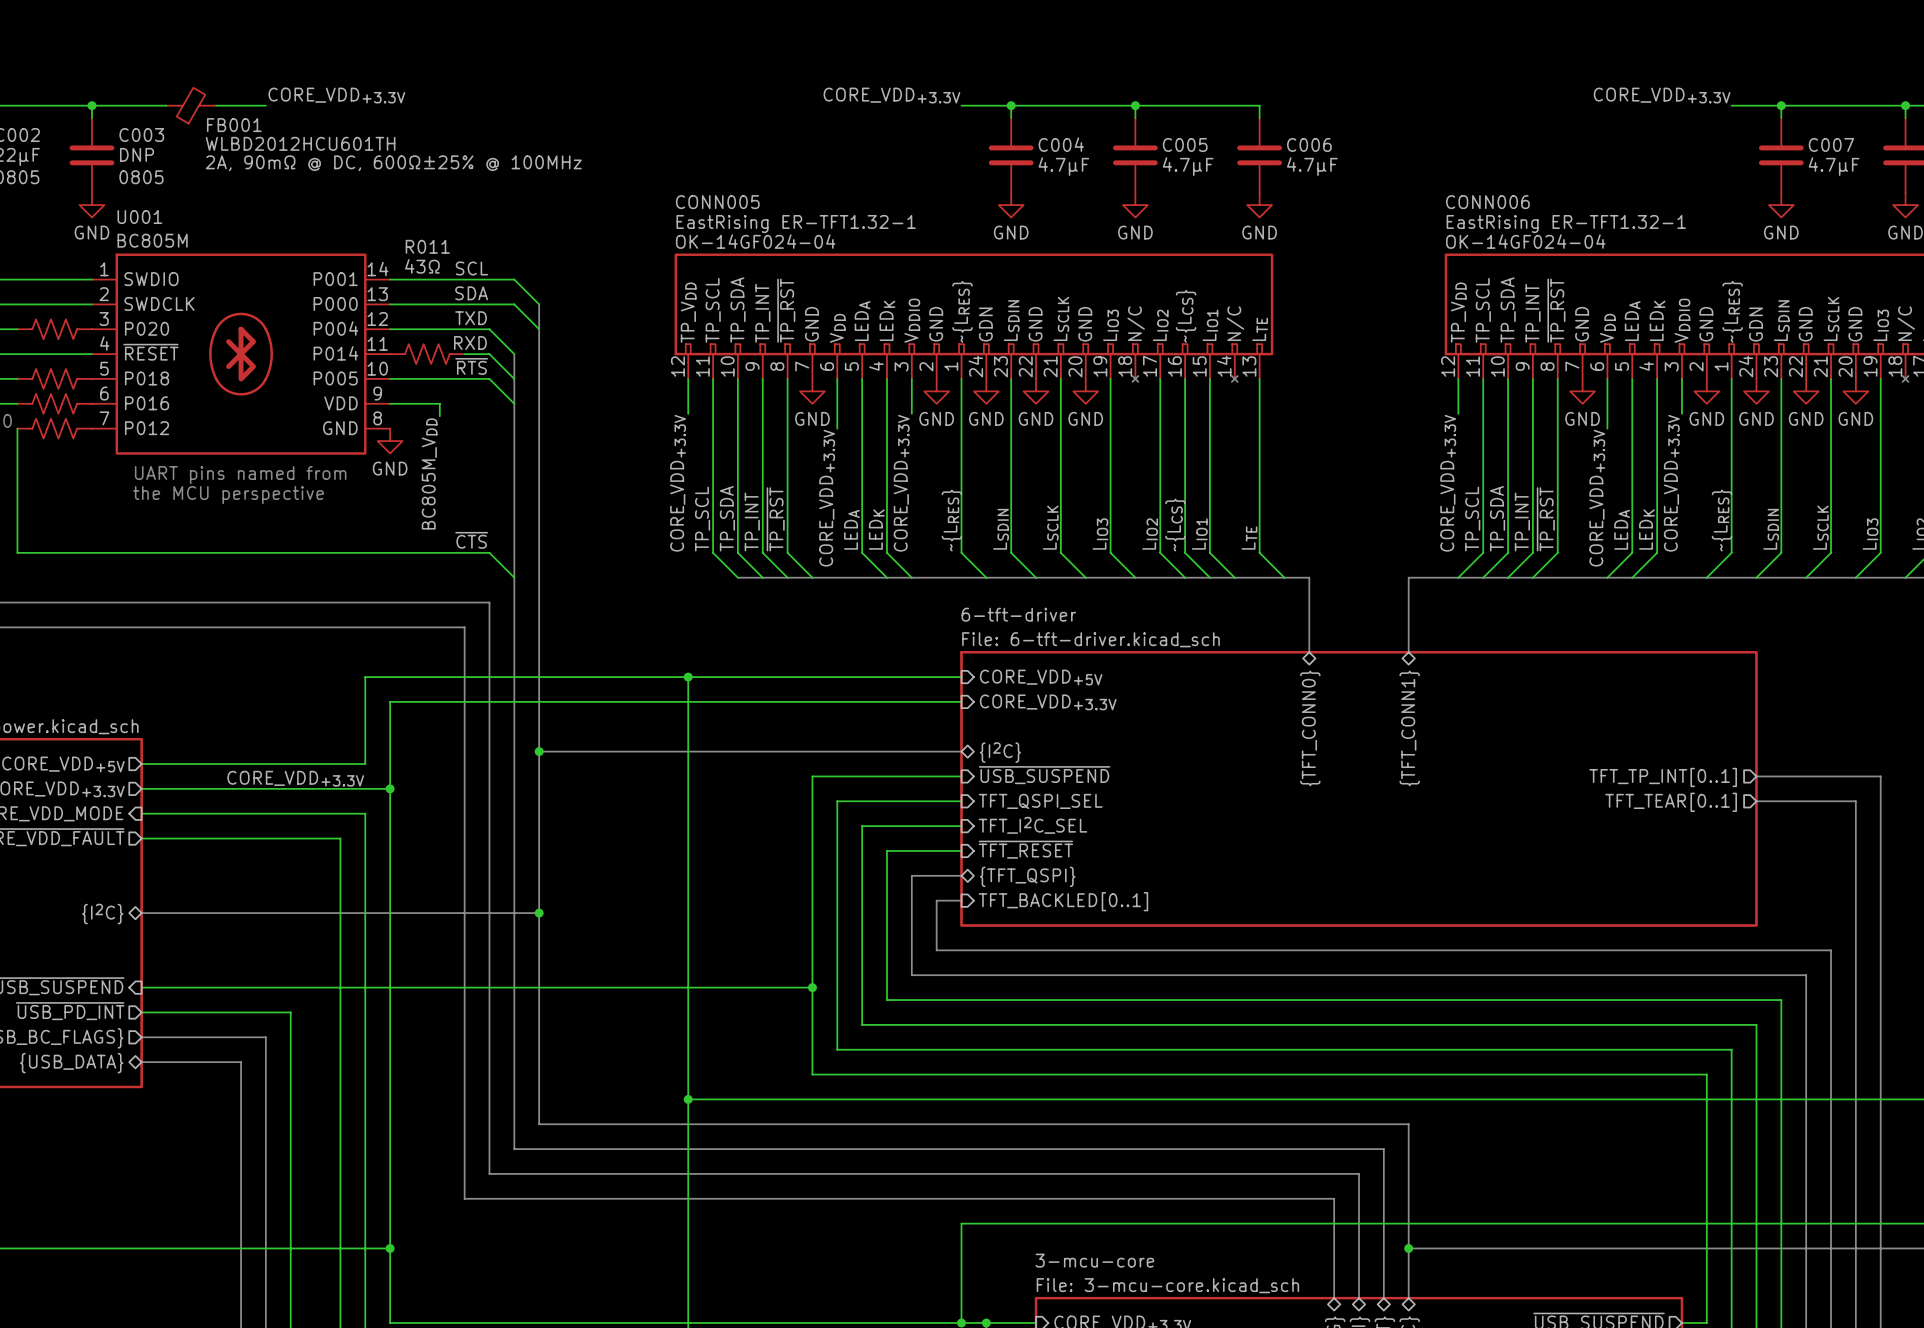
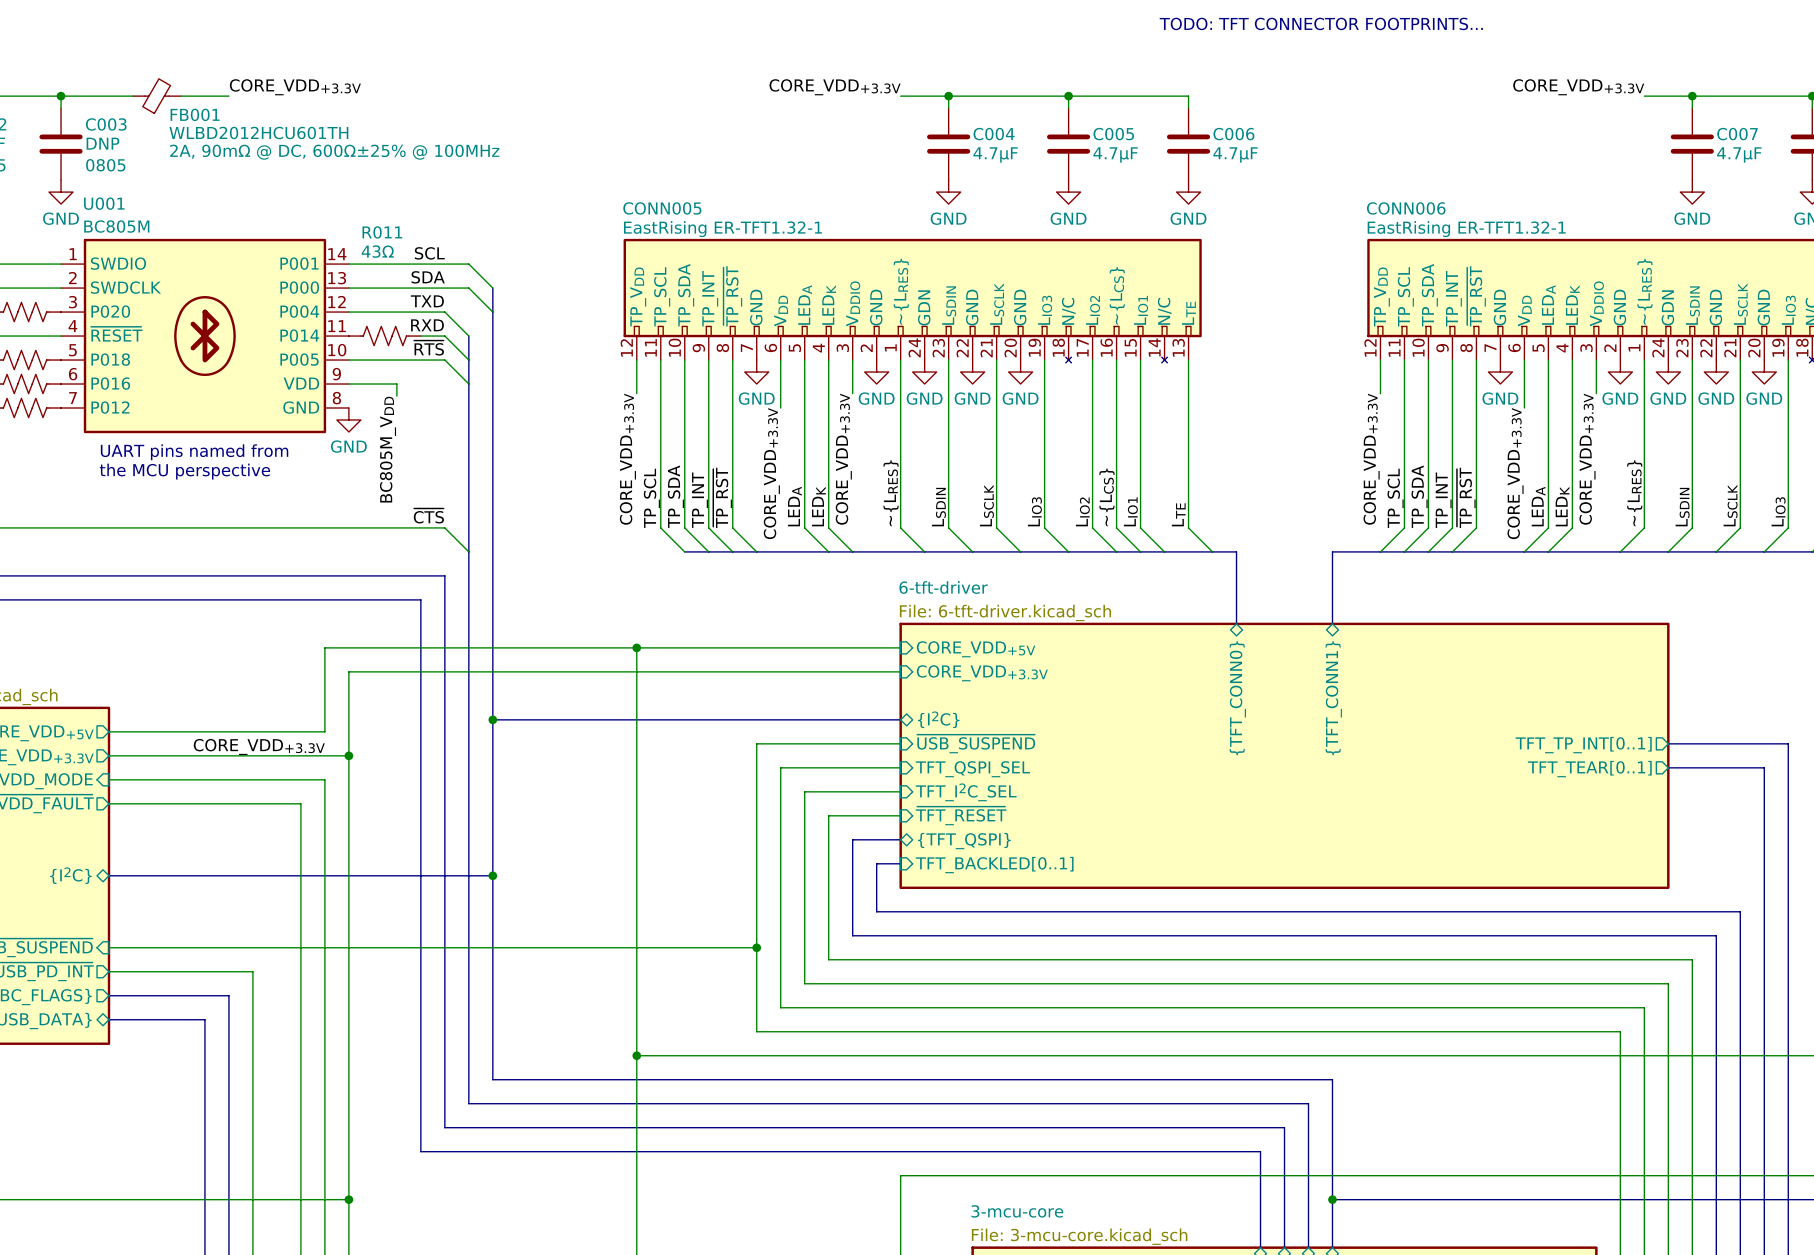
text: none -> TODO: TFT CONNECTOR FOOTPRINTS... (1321, 23)
CONN005 name position: CONN005 (717, 202) -> CONN005 (662, 208)
CONN006 name position: CONN006 (1487, 202) -> CONN006 (1406, 208)
CONN005 value position: EastRising ER-TFT1.32-1 (796, 224) -> EastRising ER-TFT1.32-1 (722, 229)
CONN006 value position: EastRising ER-TFT1.32-1 (1566, 224) -> EastRising ER-TFT1.32-1 (1466, 229)
CONN005 text: OK-14GF024-04 (755, 241) -> none
CONN006 text: OK-14GF024-04 (1525, 241) -> none

